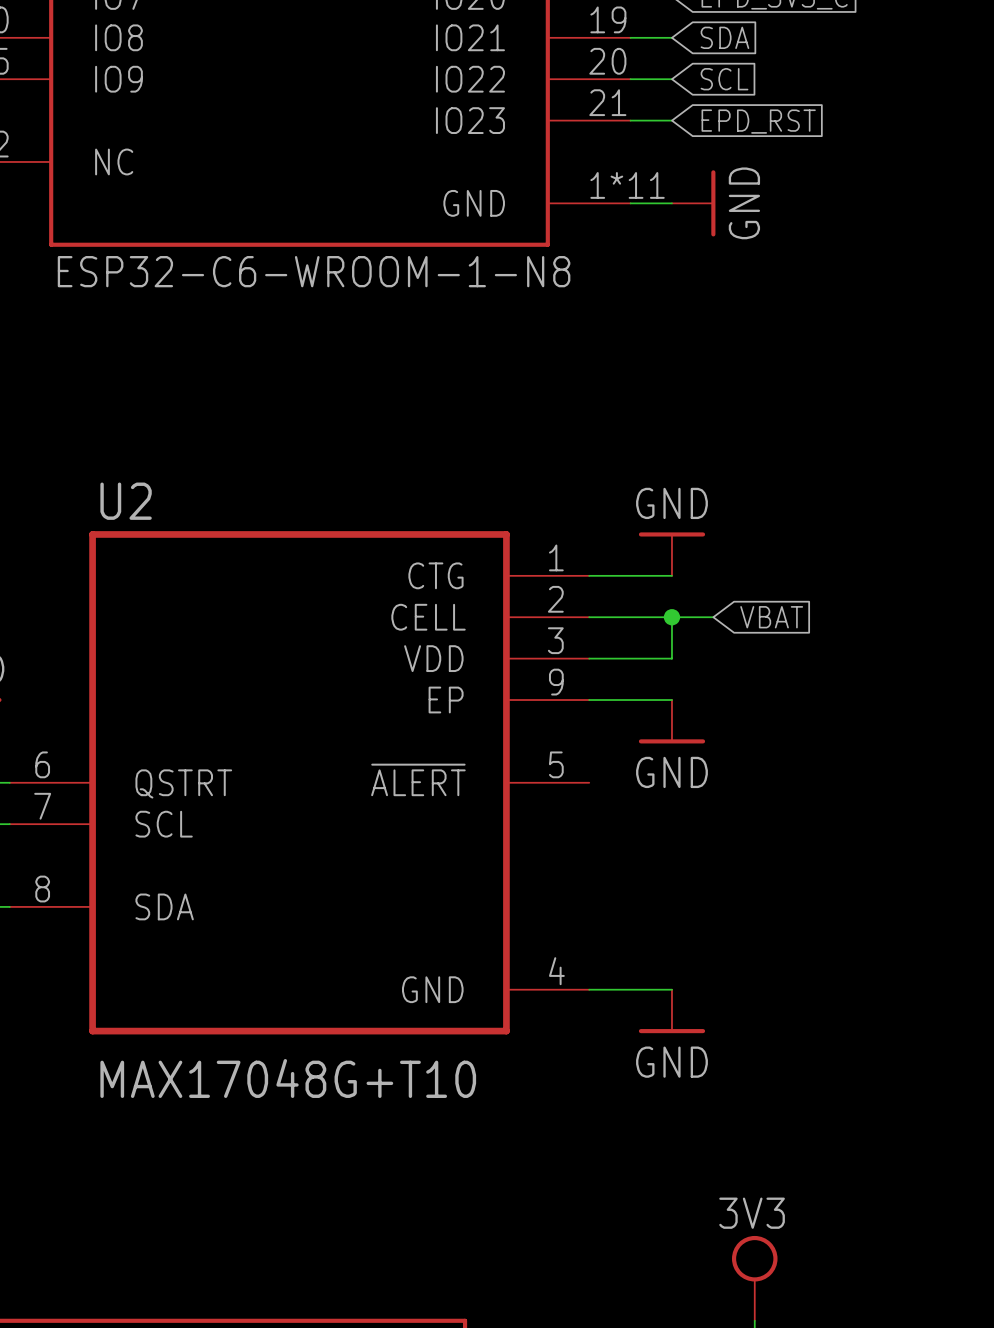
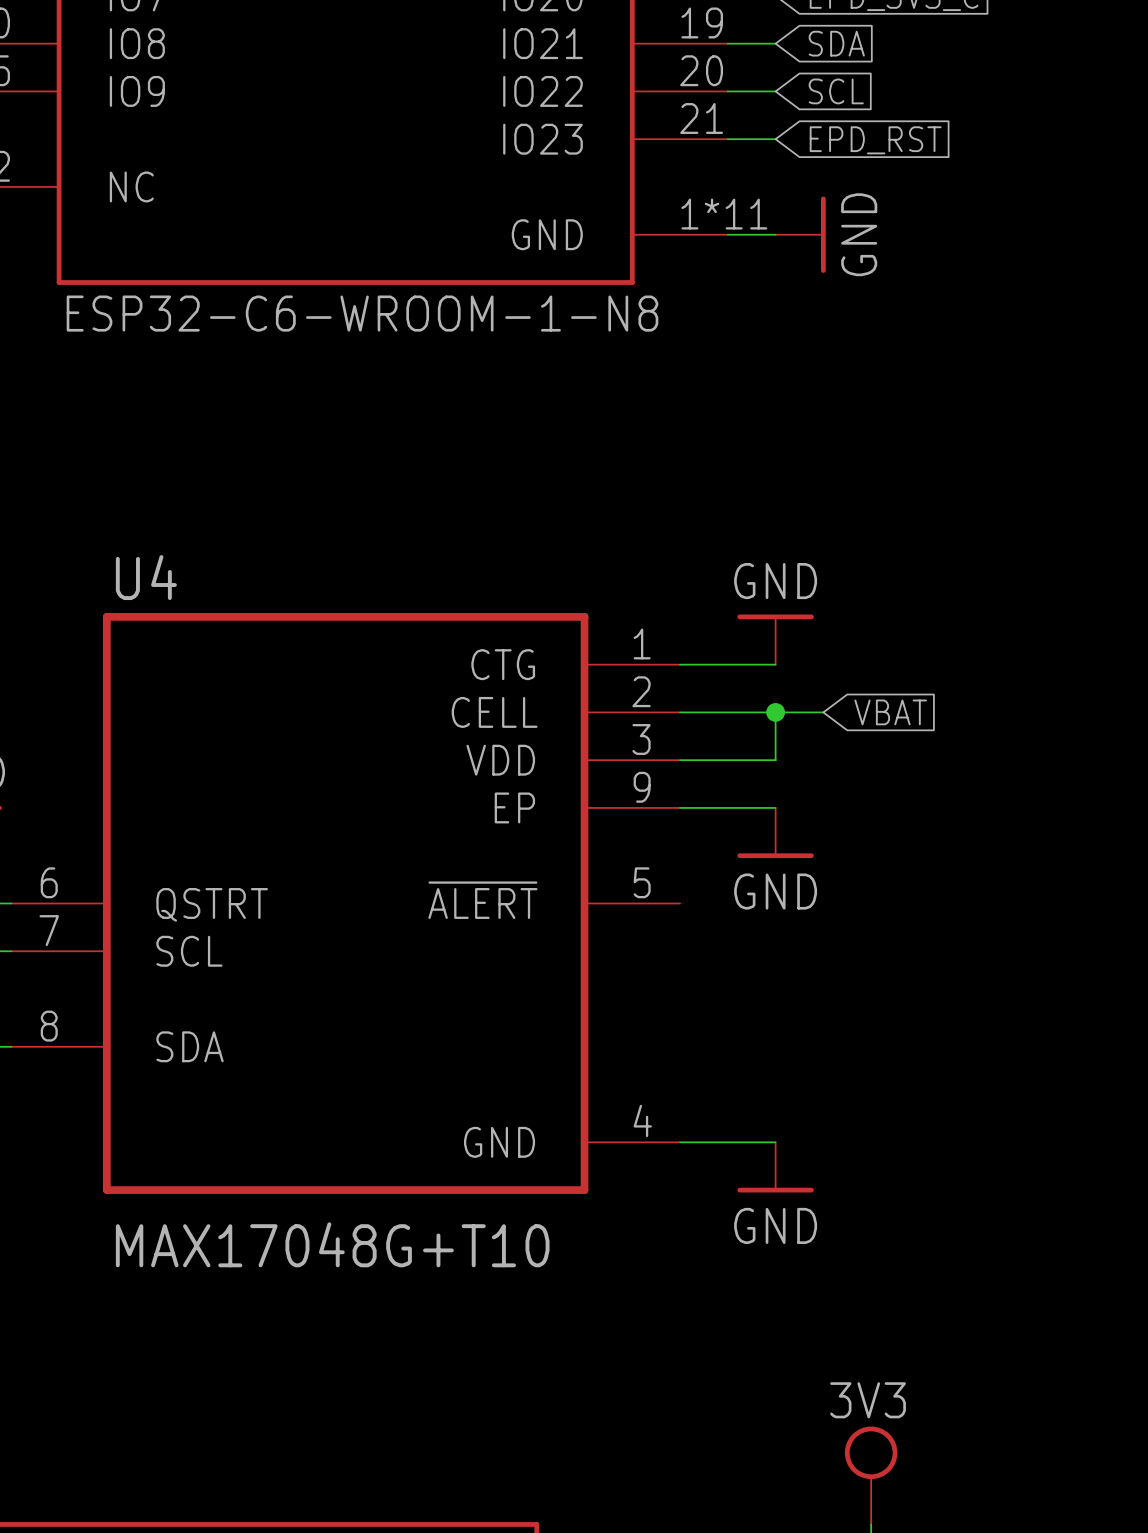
U2 name: U2 (126, 501) -> U4 (146, 577)

